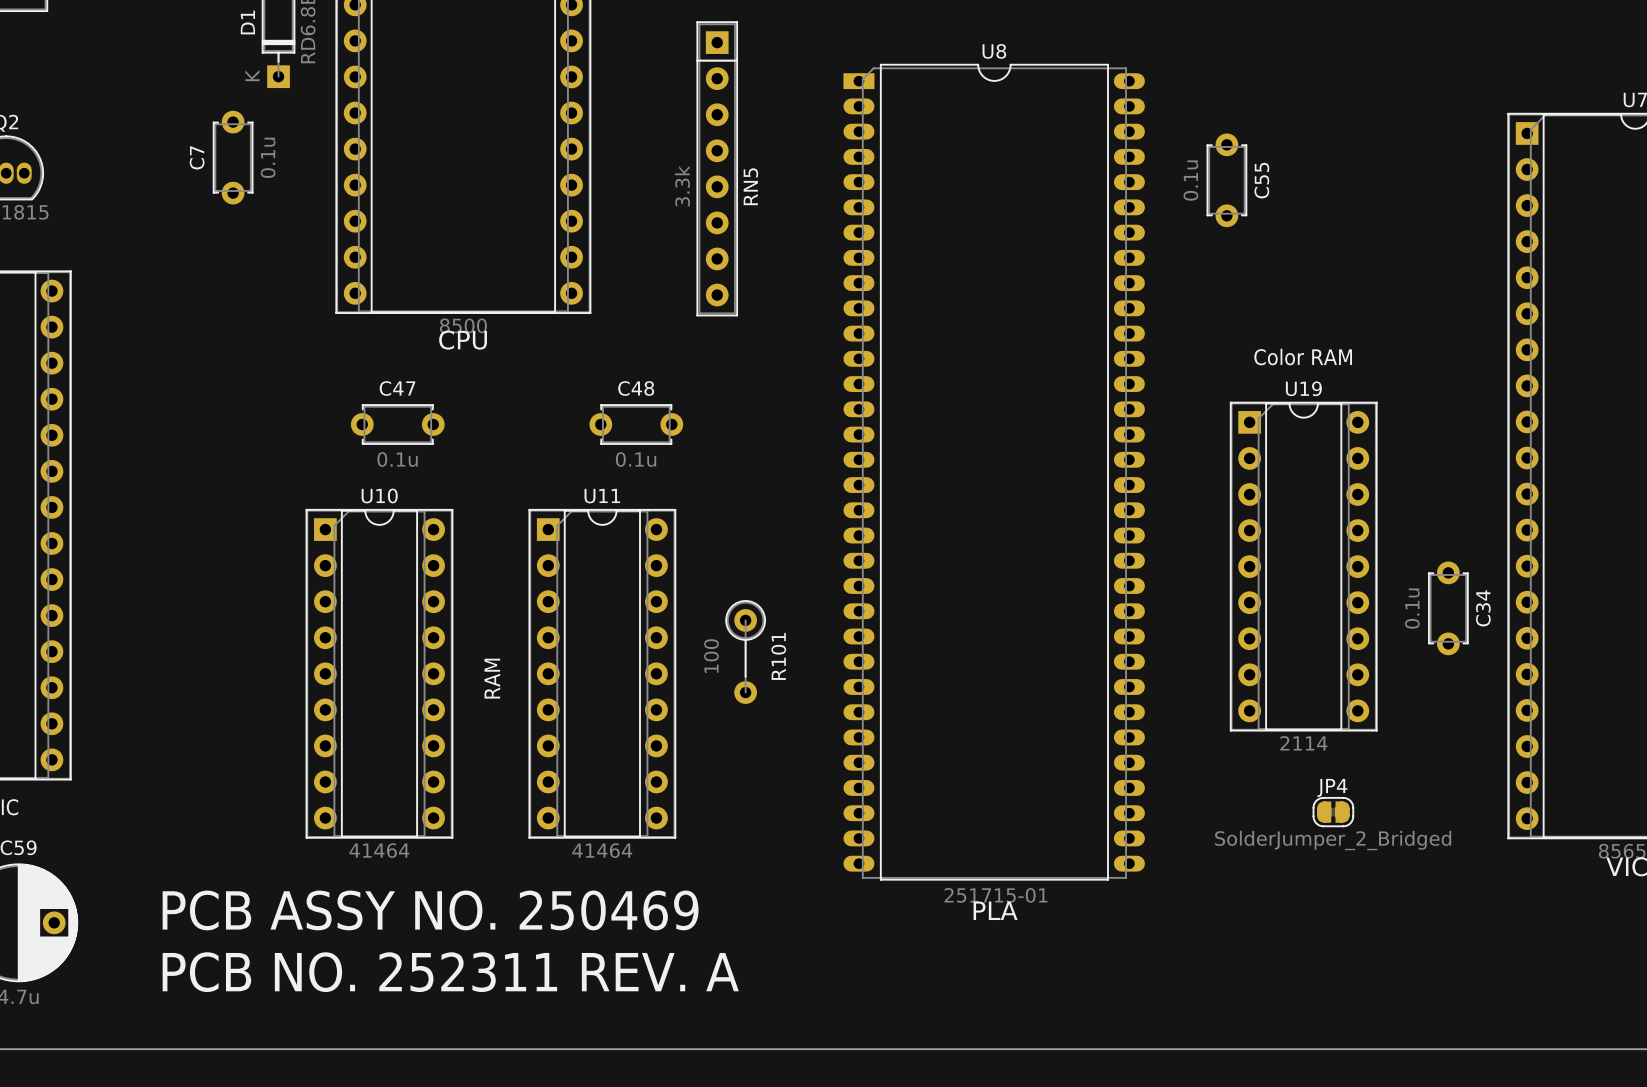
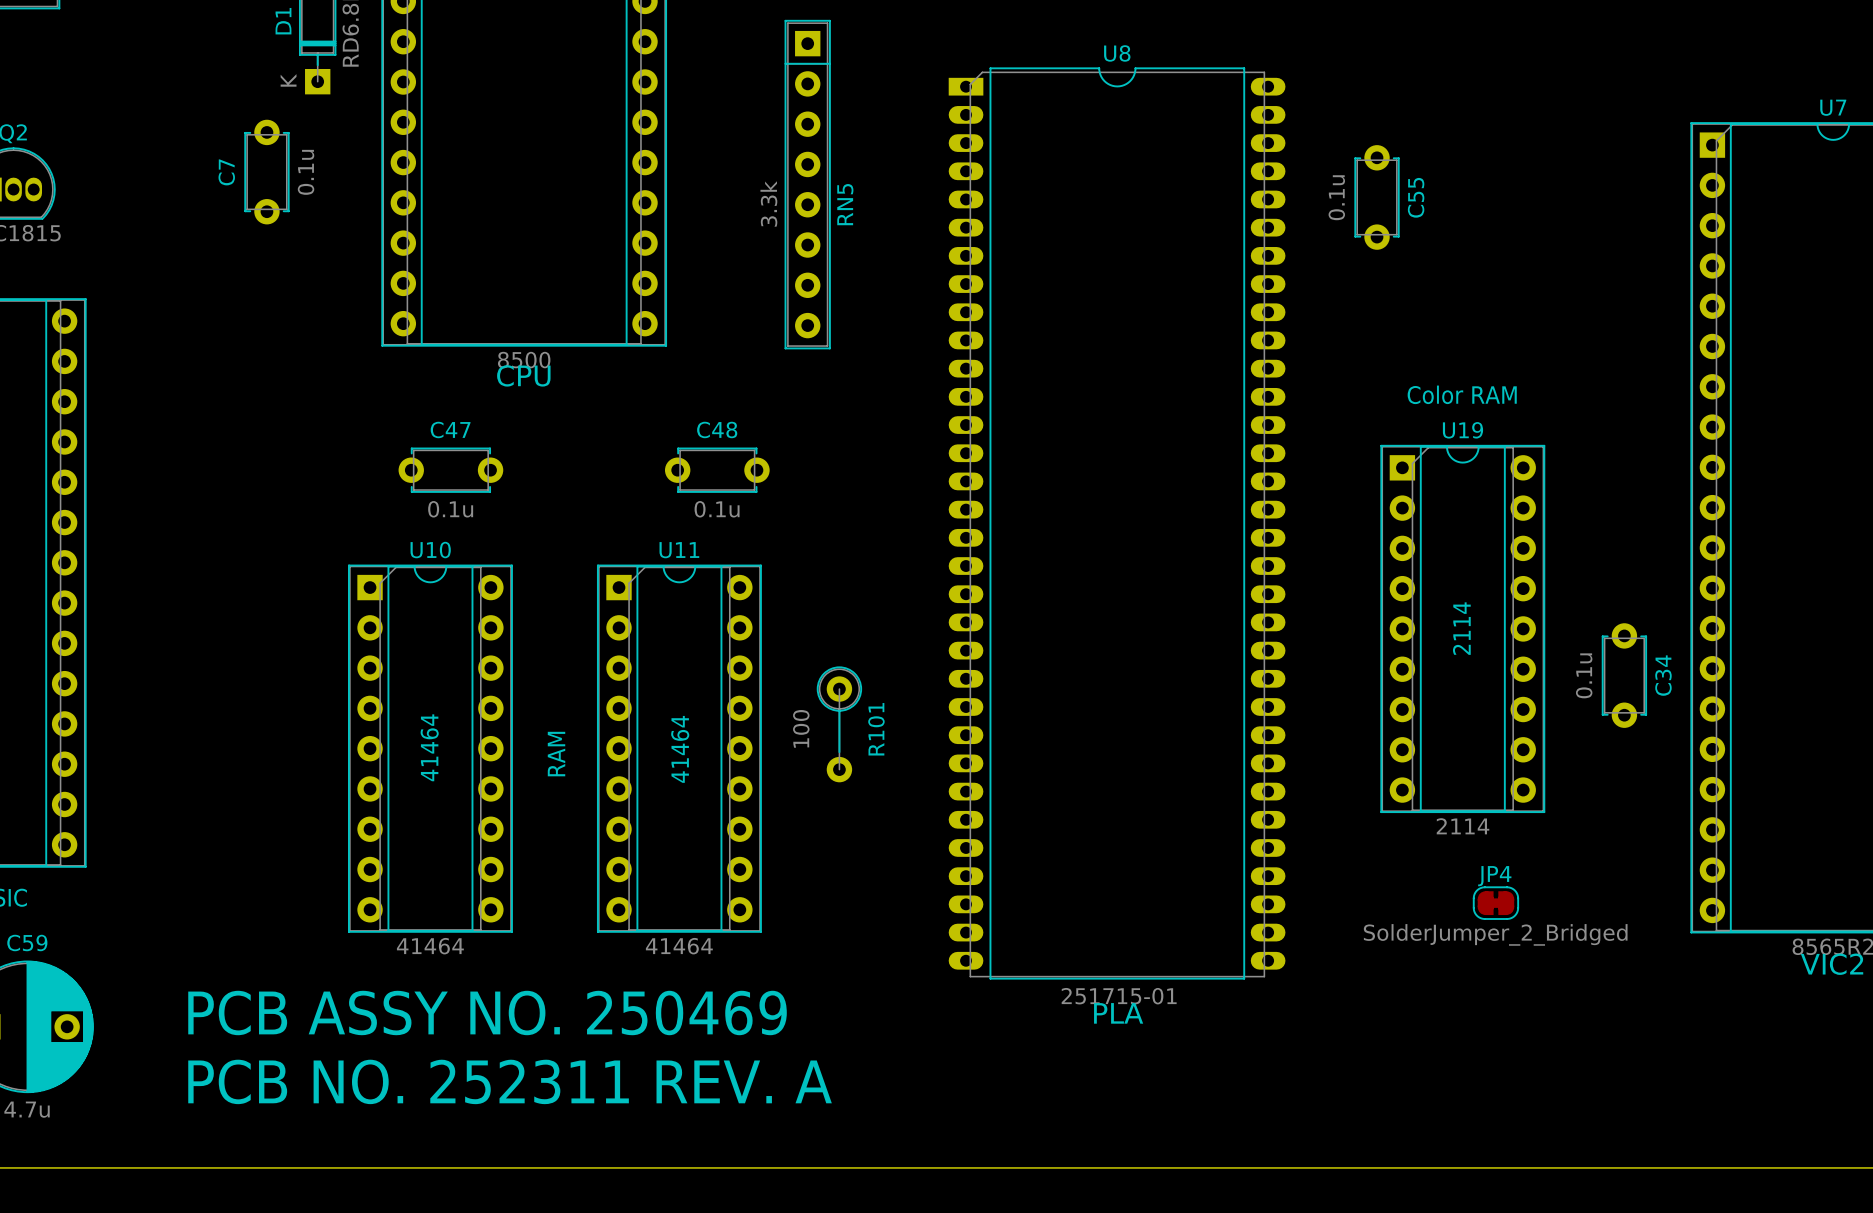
text: none -> 2114 (1461, 628)
text: none -> 41464 (429, 747)
text: none -> 41464 (680, 749)

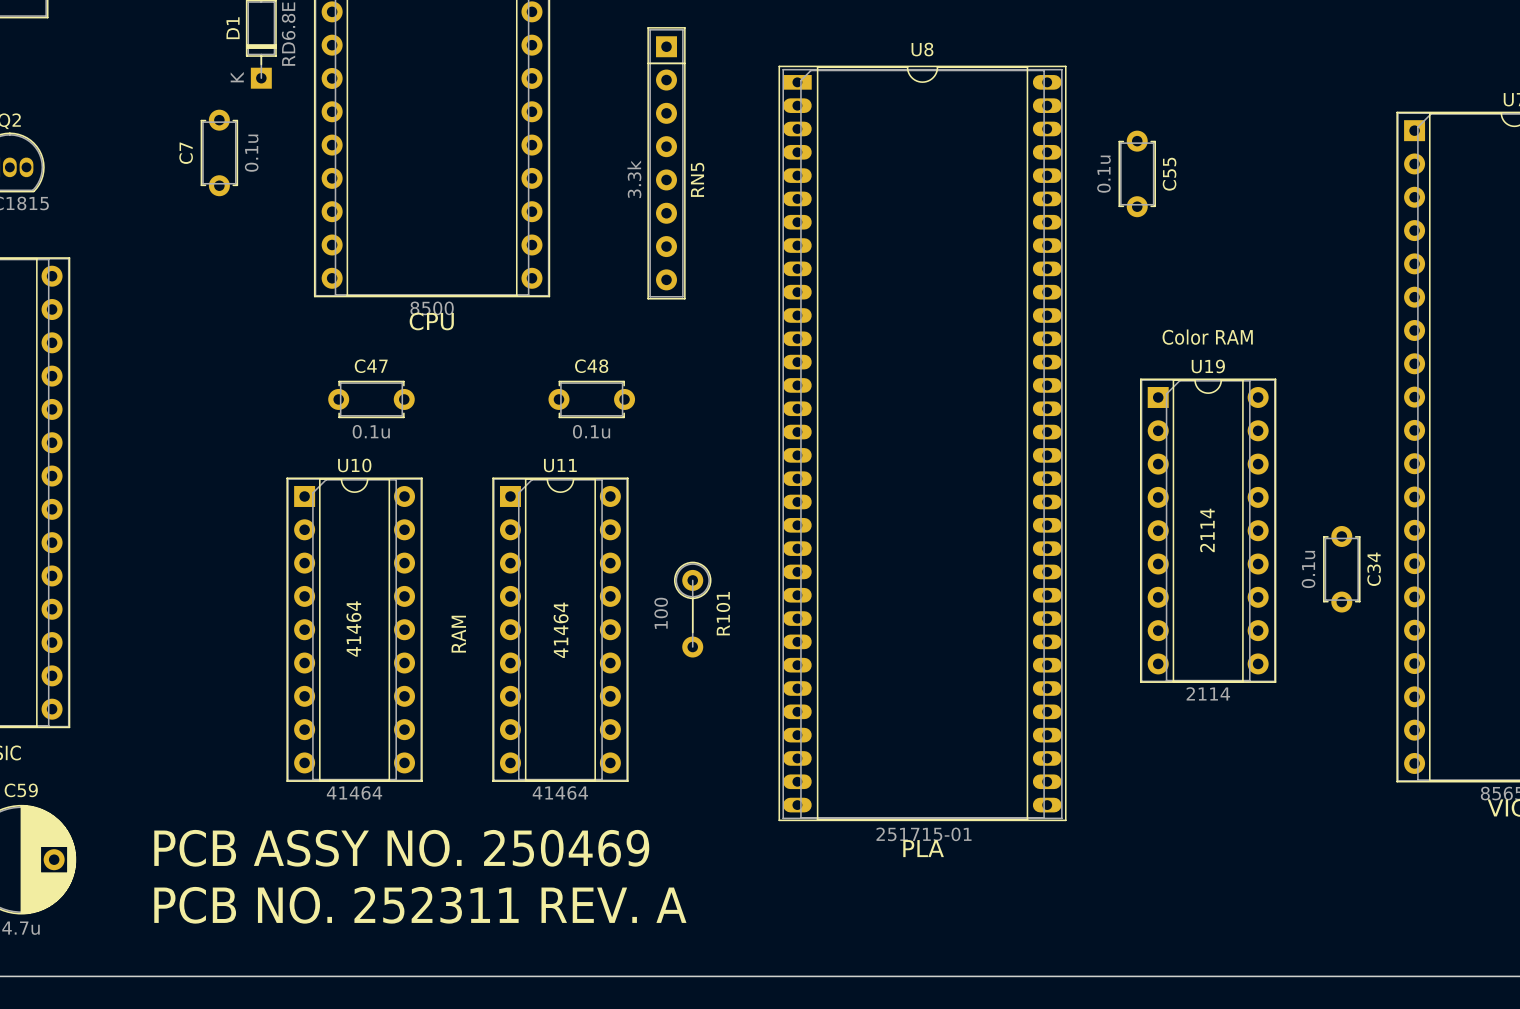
U8 footprint: [948, 67, 1286, 980] -> [778, 65, 1067, 822]
JP4: SolderJumper_2_Bridged (1495, 903) -> none

